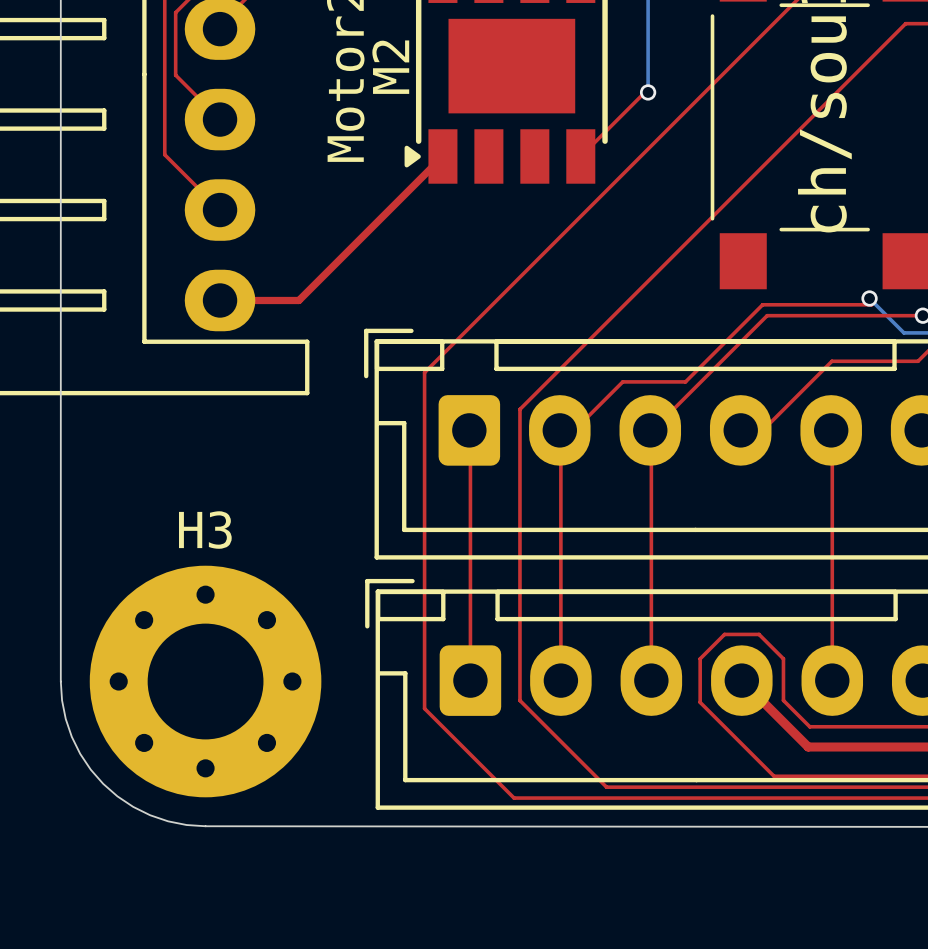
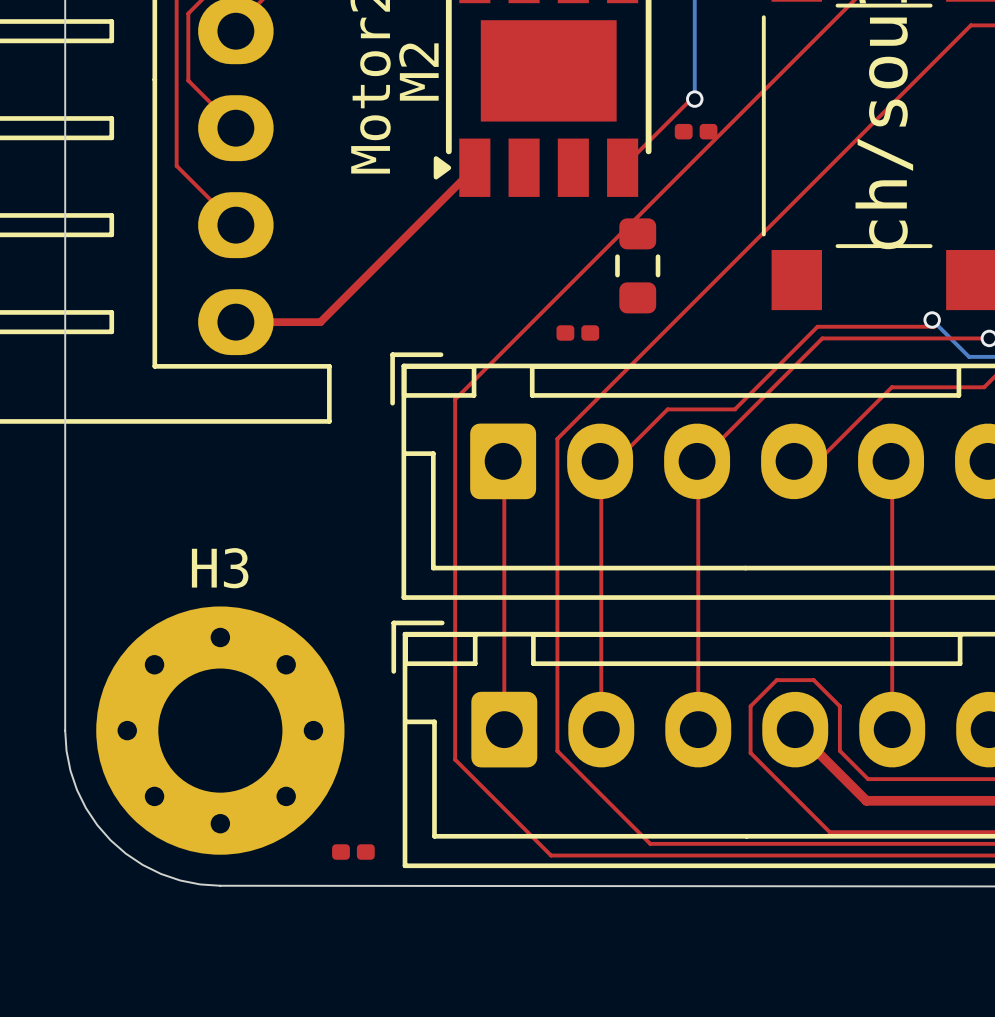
part: none -> (696, 131)
part: none -> (637, 265)
part: none -> (577, 332)
part: none -> (353, 852)

